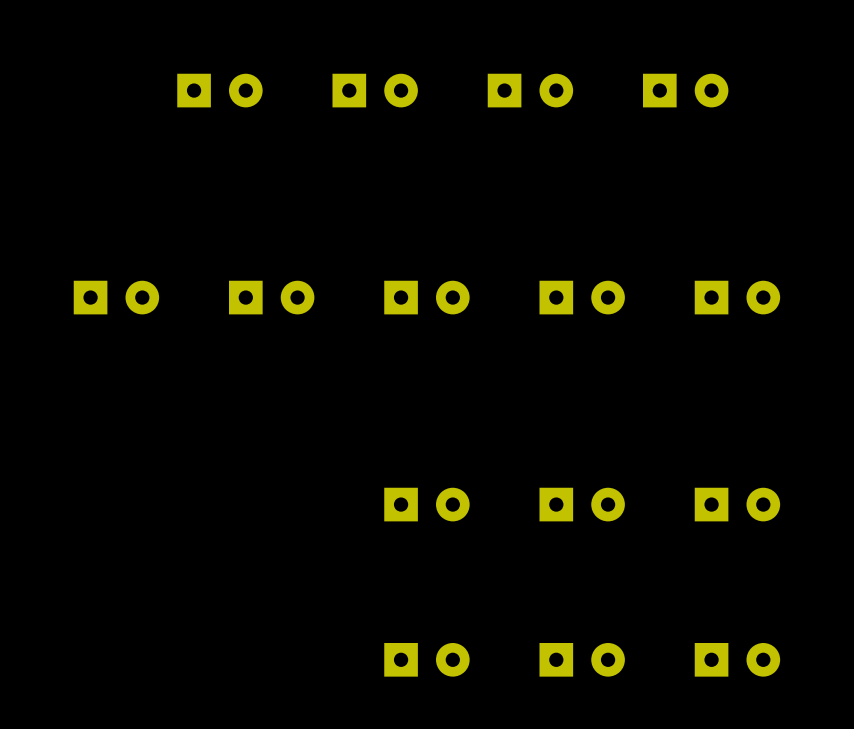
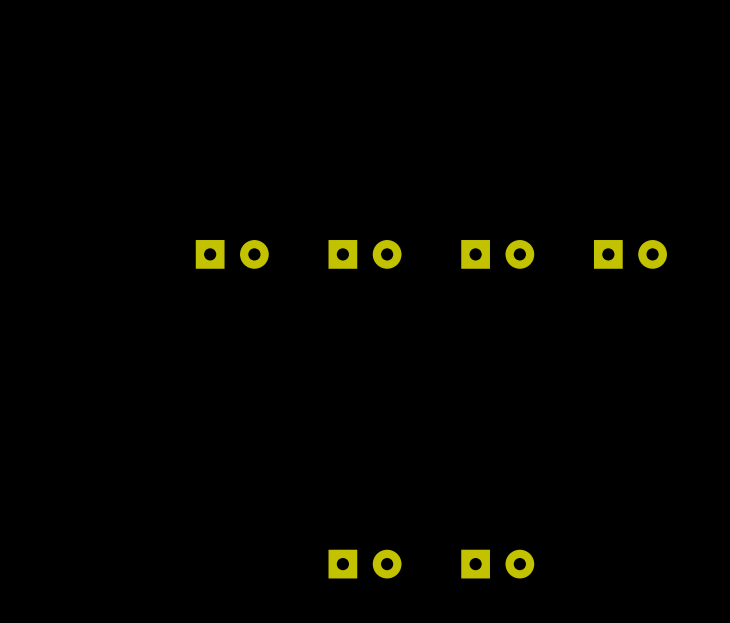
part: (219, 90) -> none
part: (375, 90) -> none
part: (530, 90) -> none
part: (685, 90) -> none
part: (116, 297) -> none
part: (426, 504) -> none
part: (582, 504) -> none
part: (737, 504) -> none
part: (737, 659) -> none

